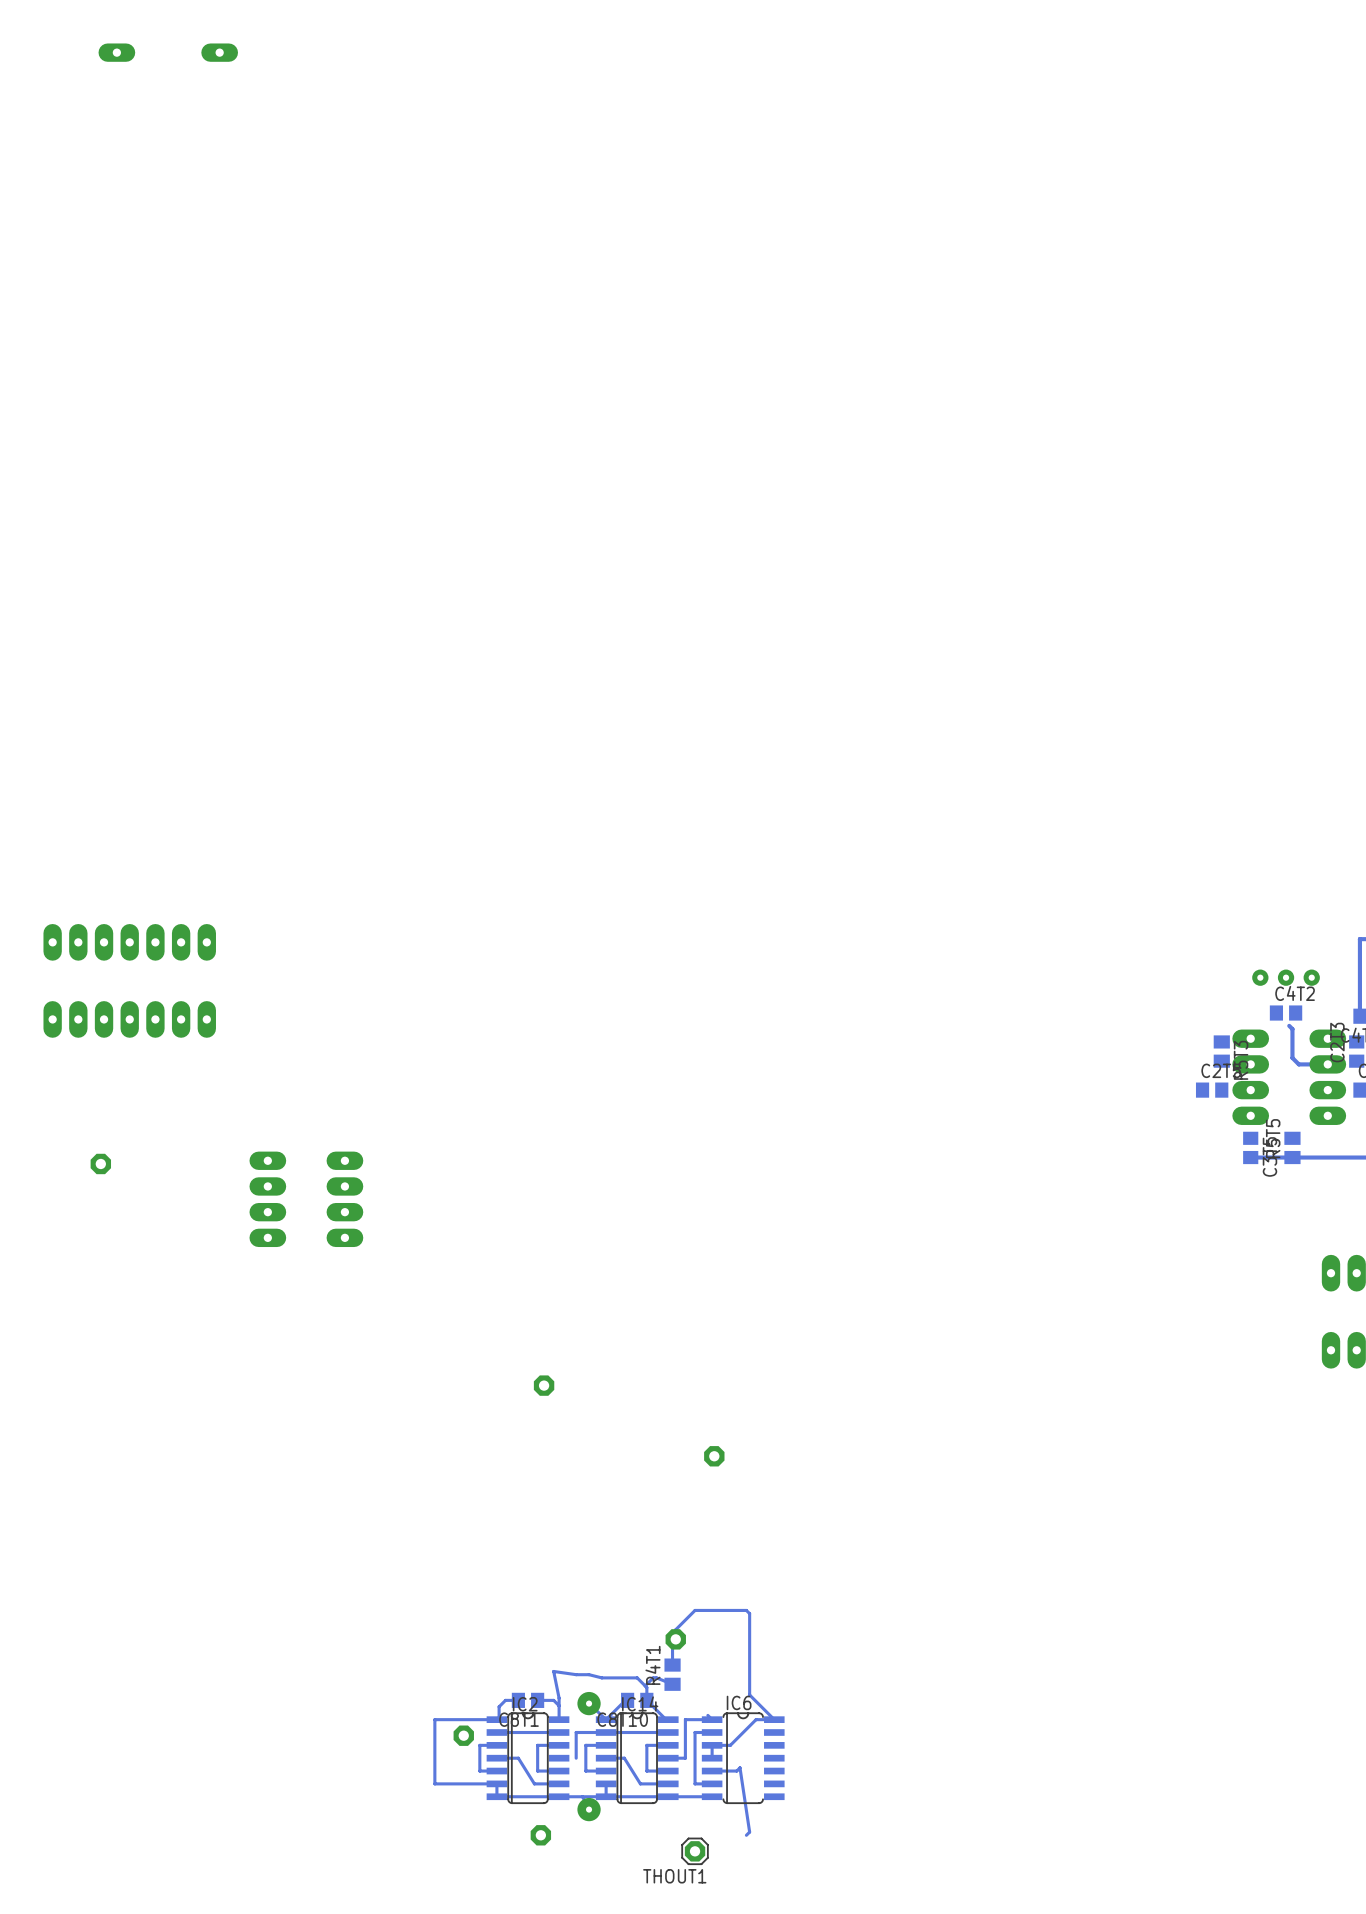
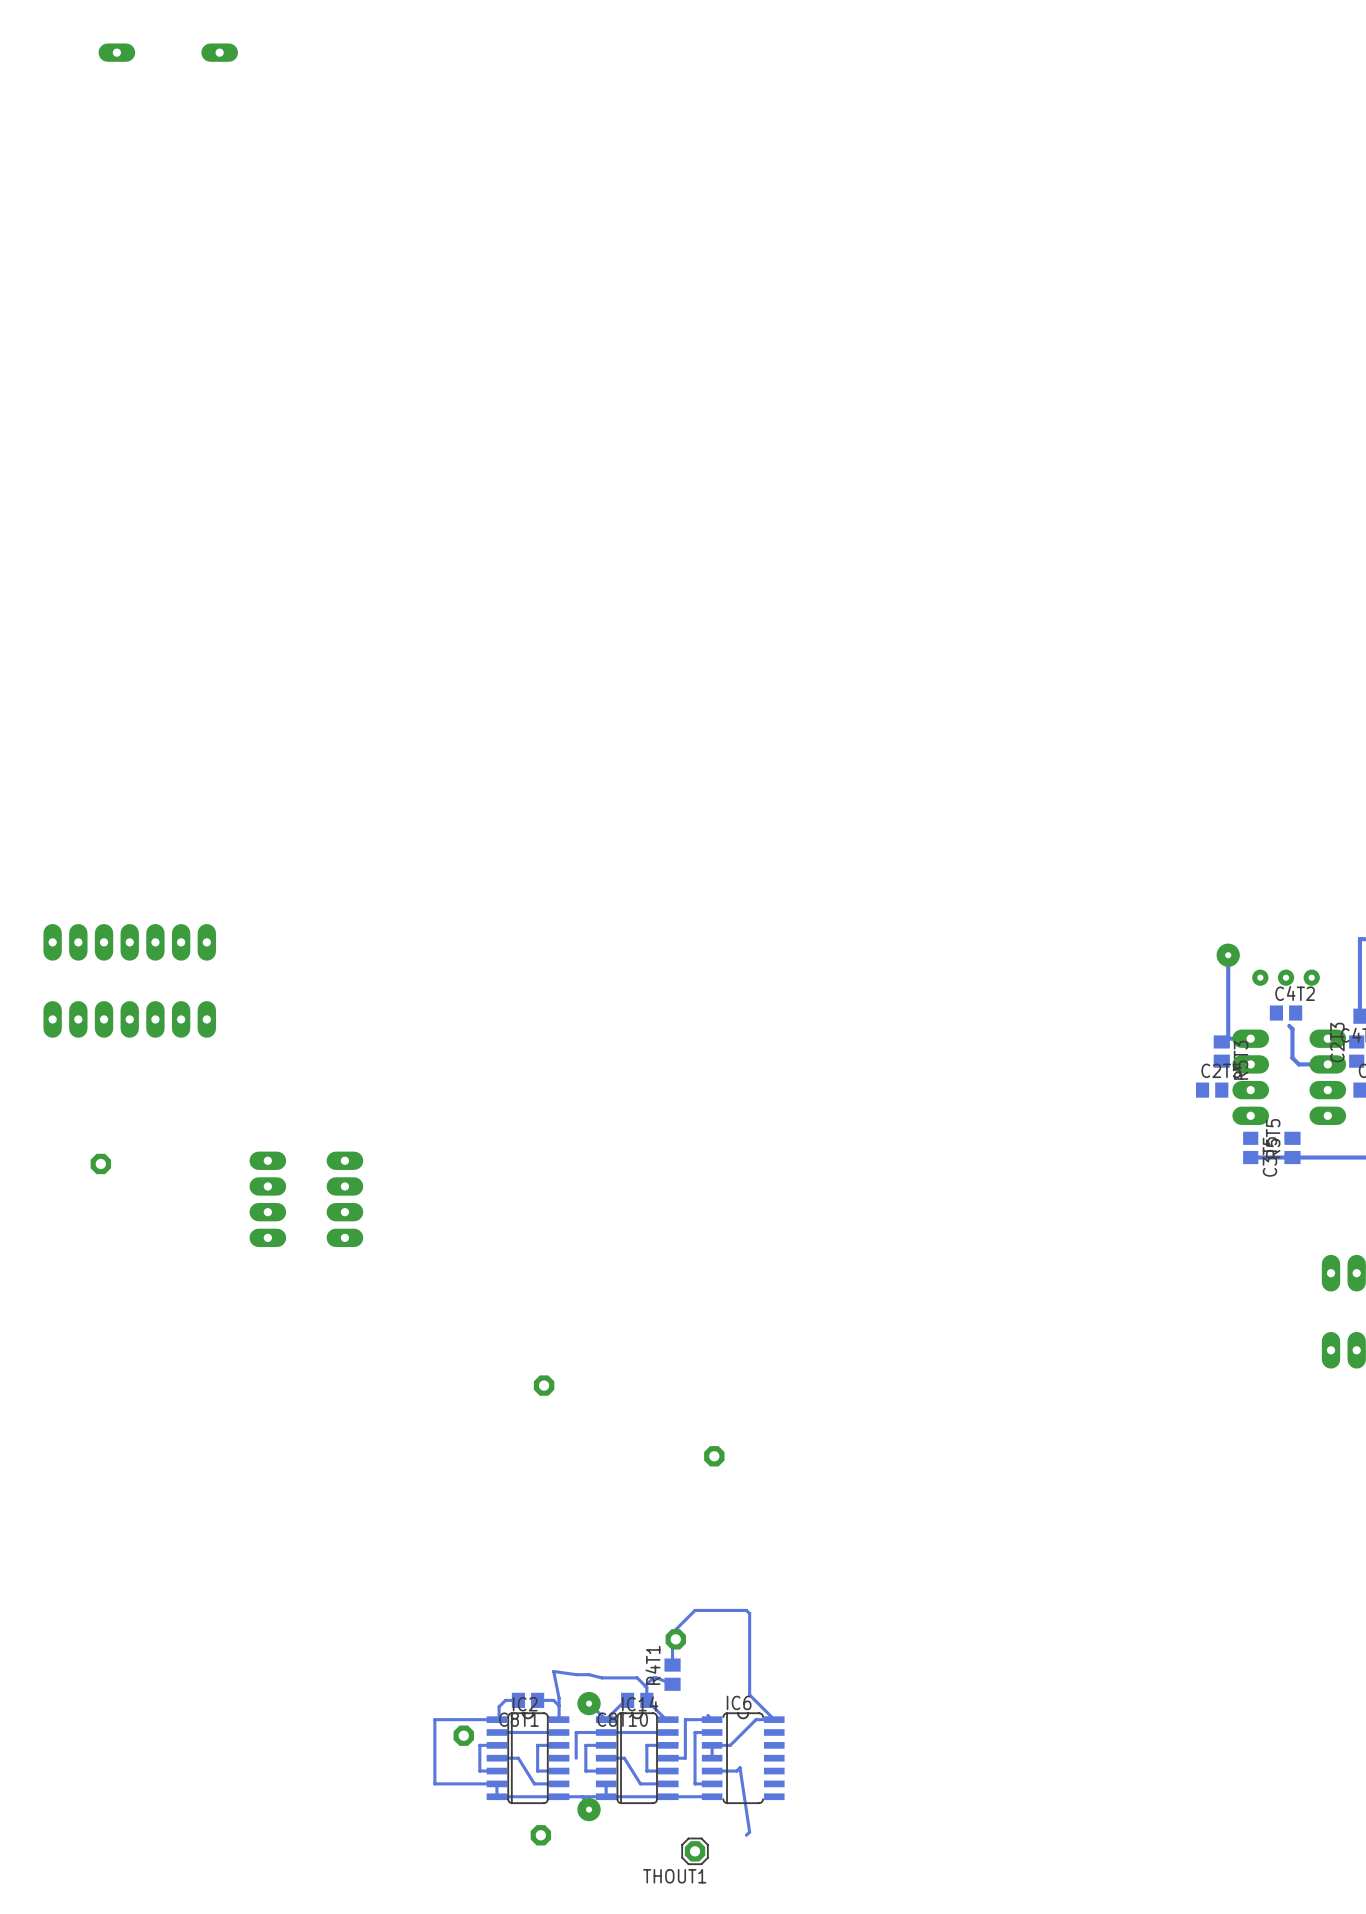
track: none -> (1228, 955) (1228, 1038) (1250, 1038)
via: none -> (1228, 955)

